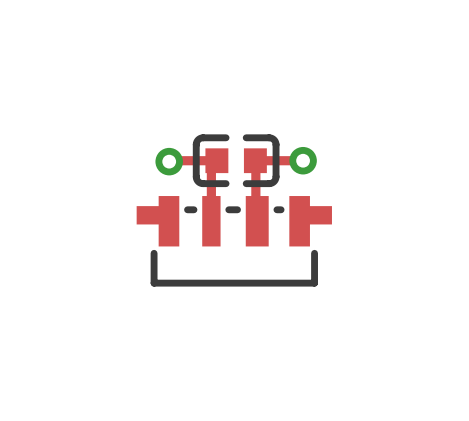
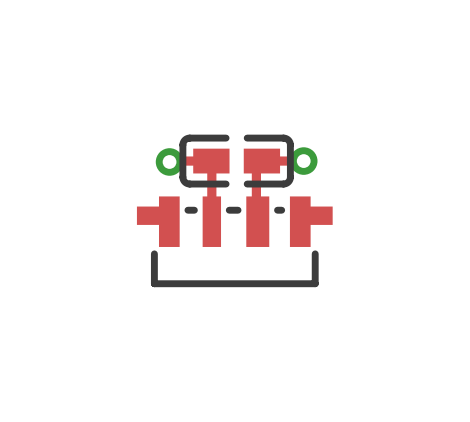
part footprint: [192, 134, 280, 188] -> [179, 134, 294, 188]

